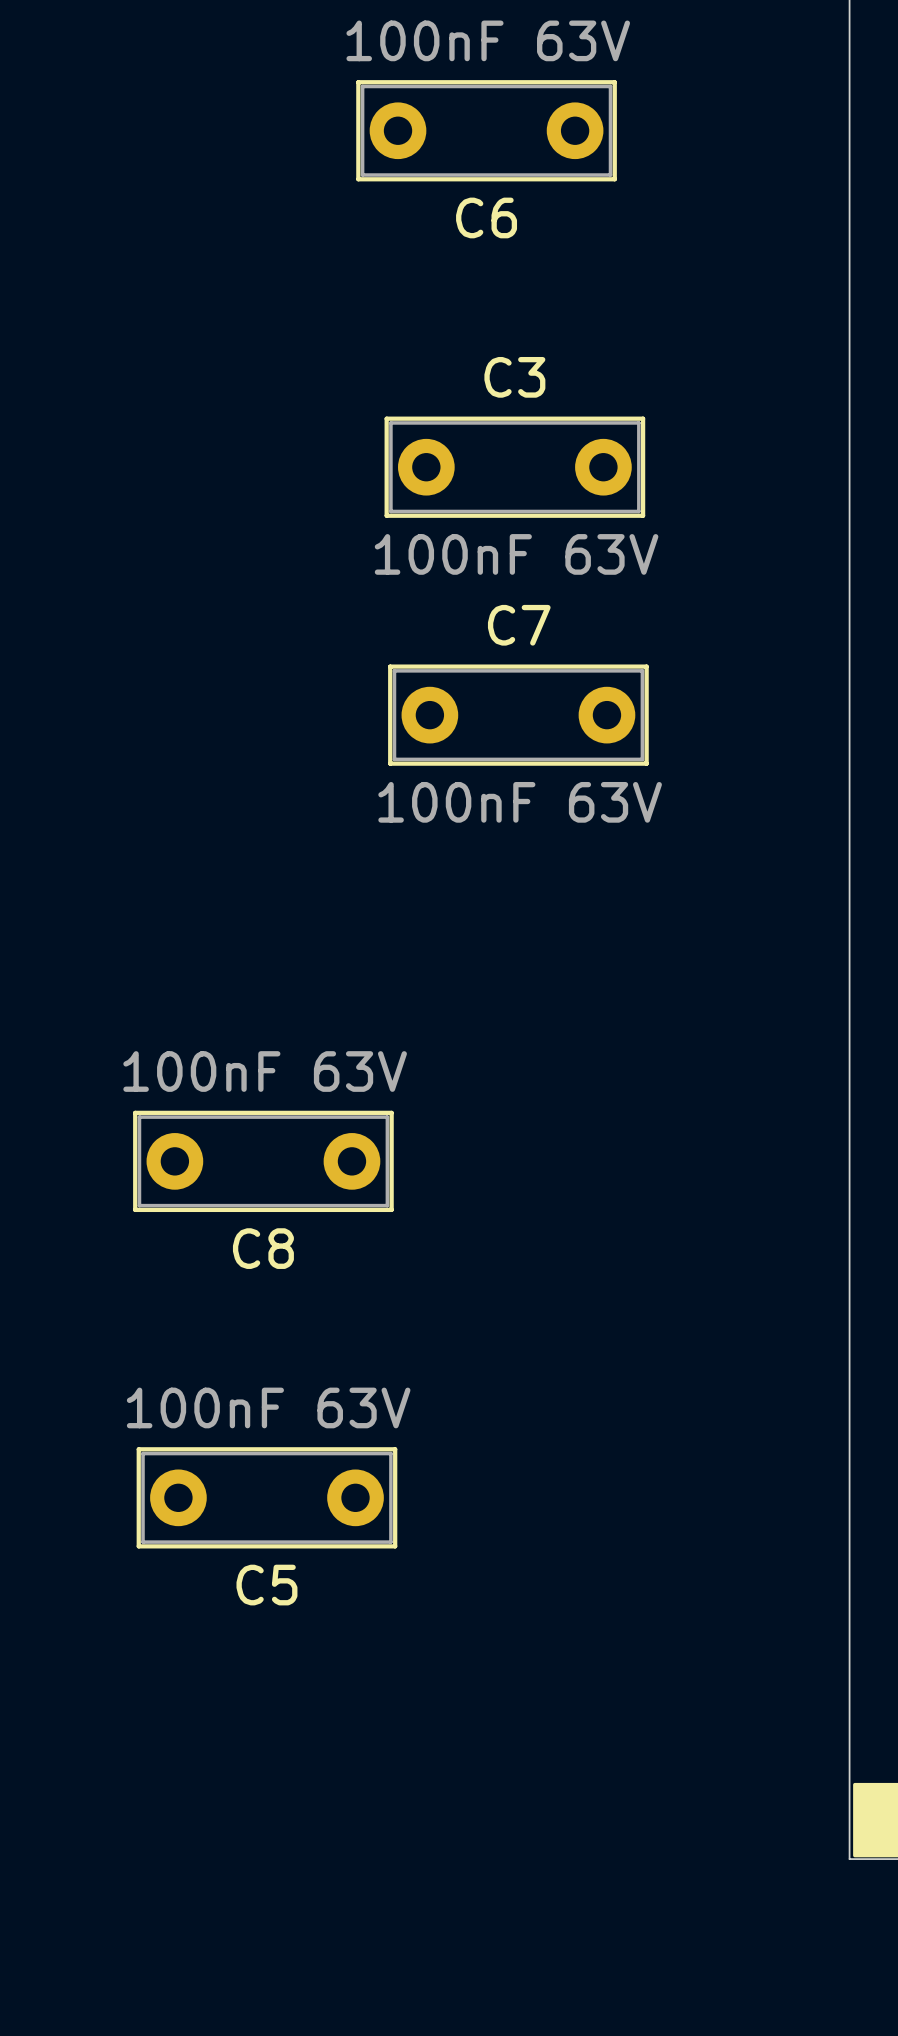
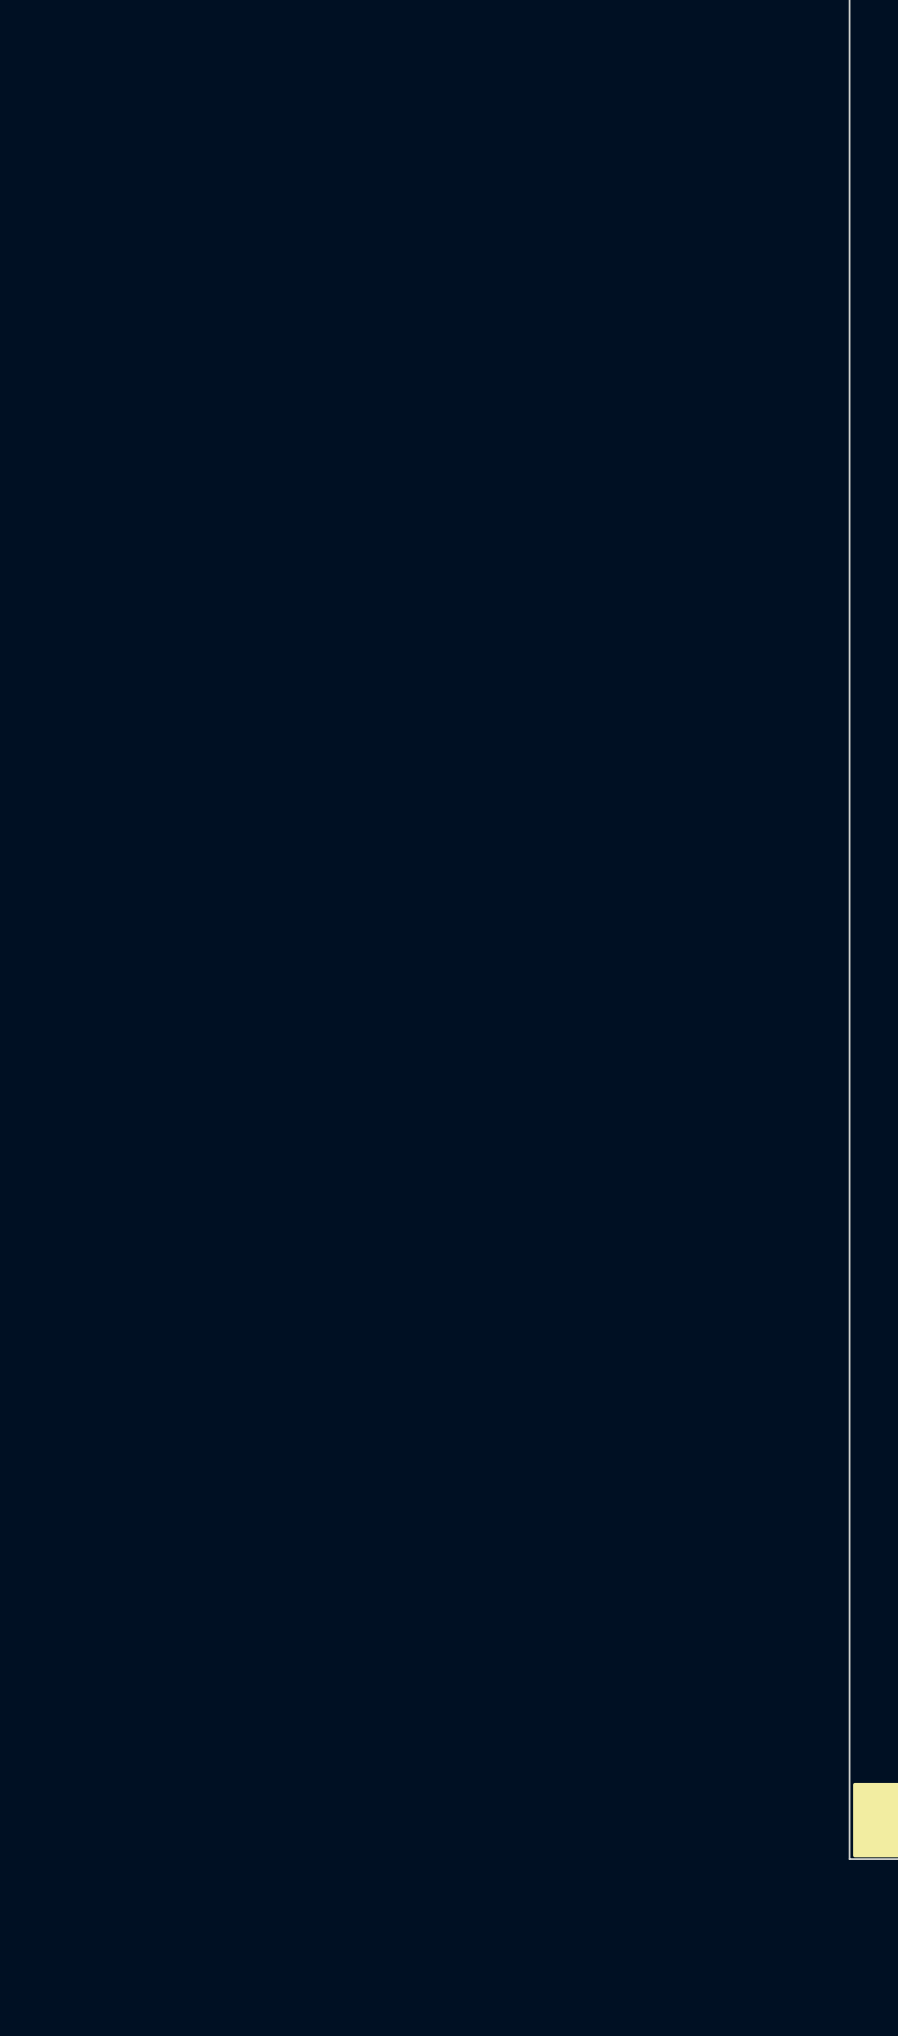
C6: 100nF 63V (486, 130) -> none
C3: 100nF 63V (514, 467) -> none
C7: 100nF 63V (518, 715) -> none
C8: 100nF 63V (263, 1161) -> none
C5: 100nF 63V (266, 1497) -> none

